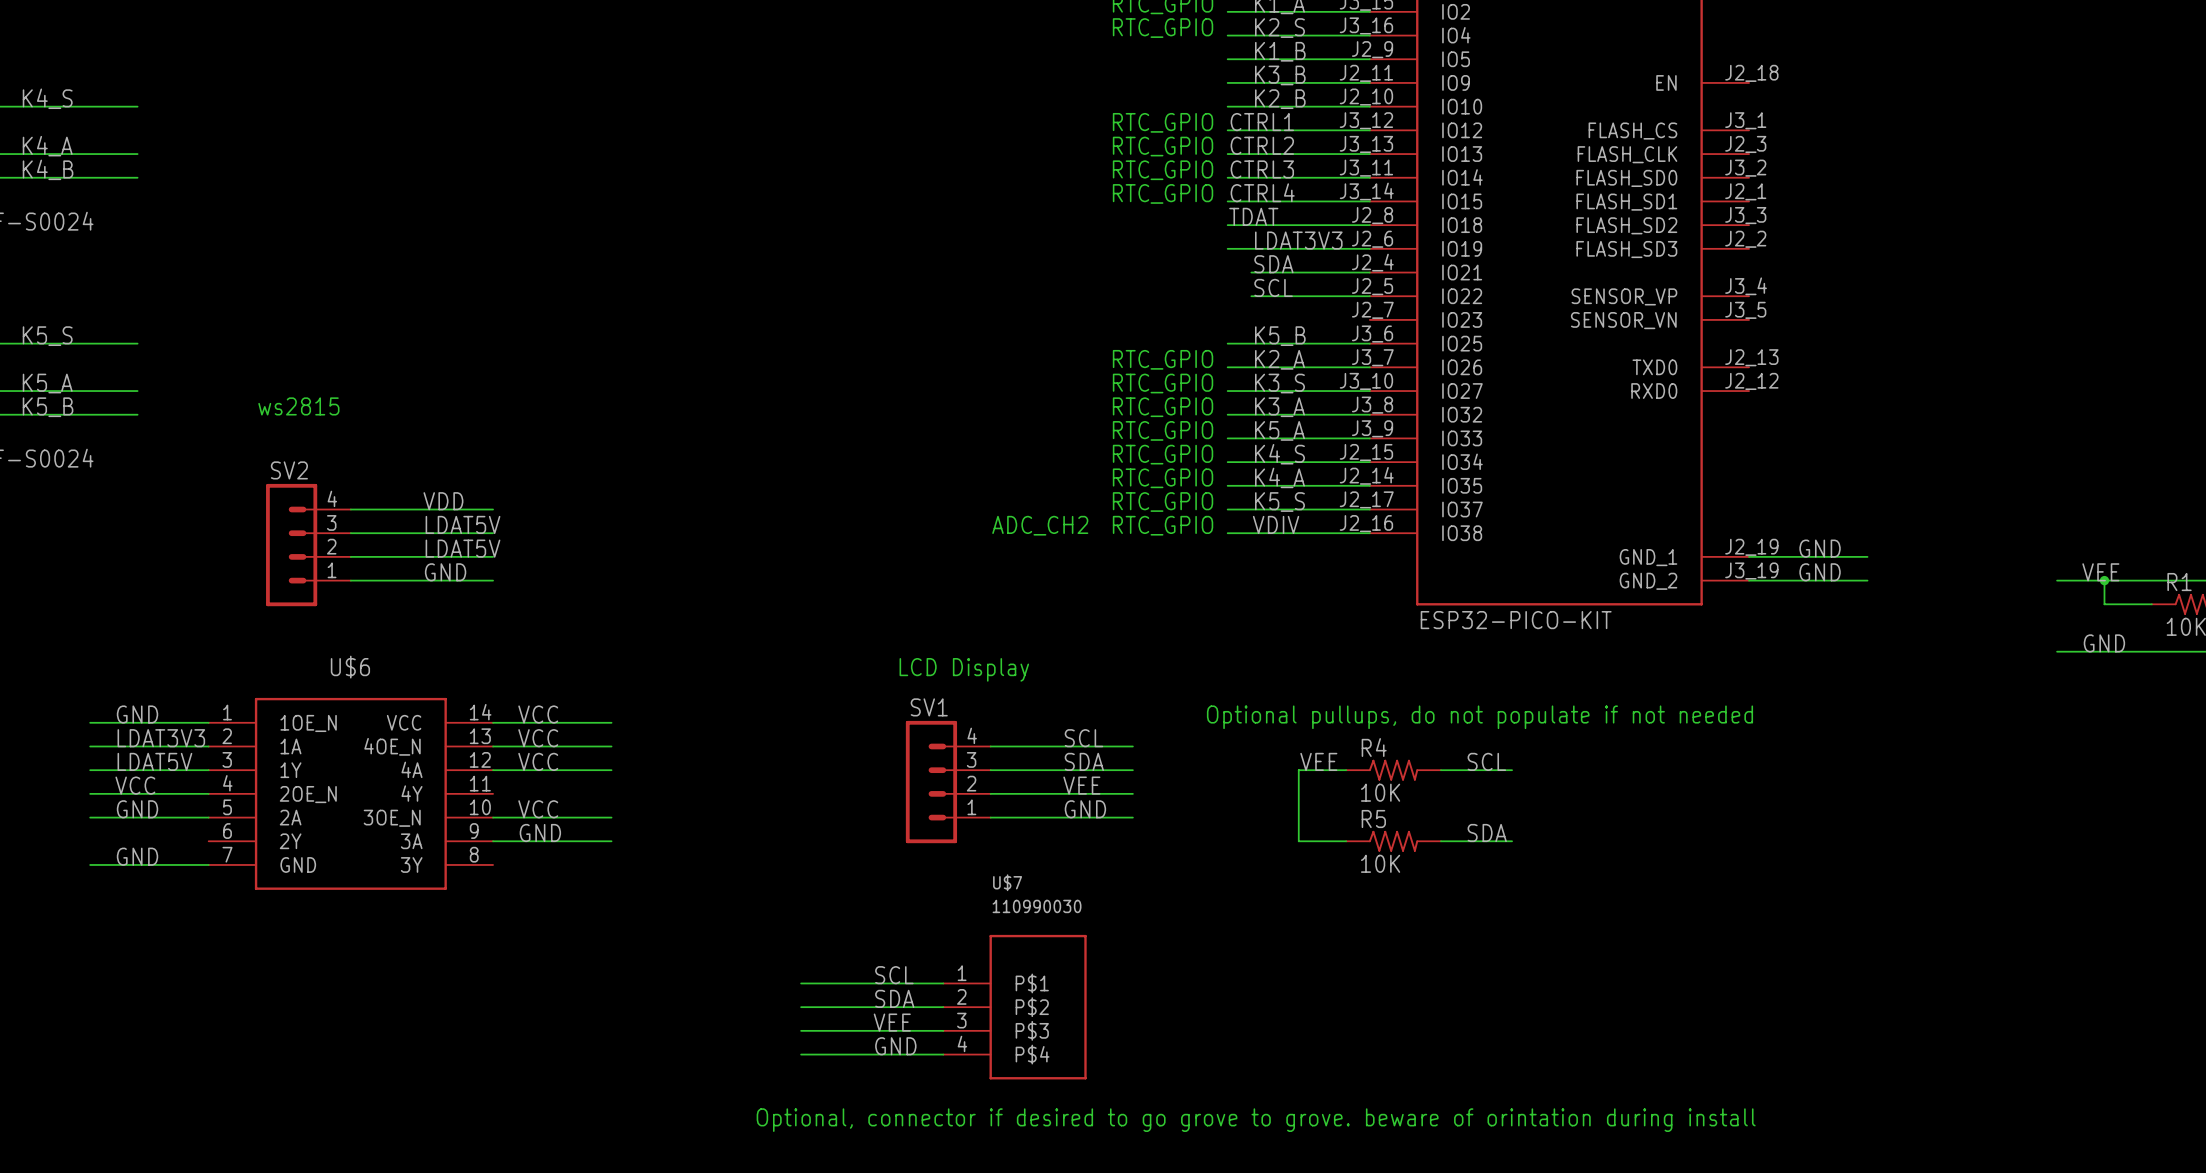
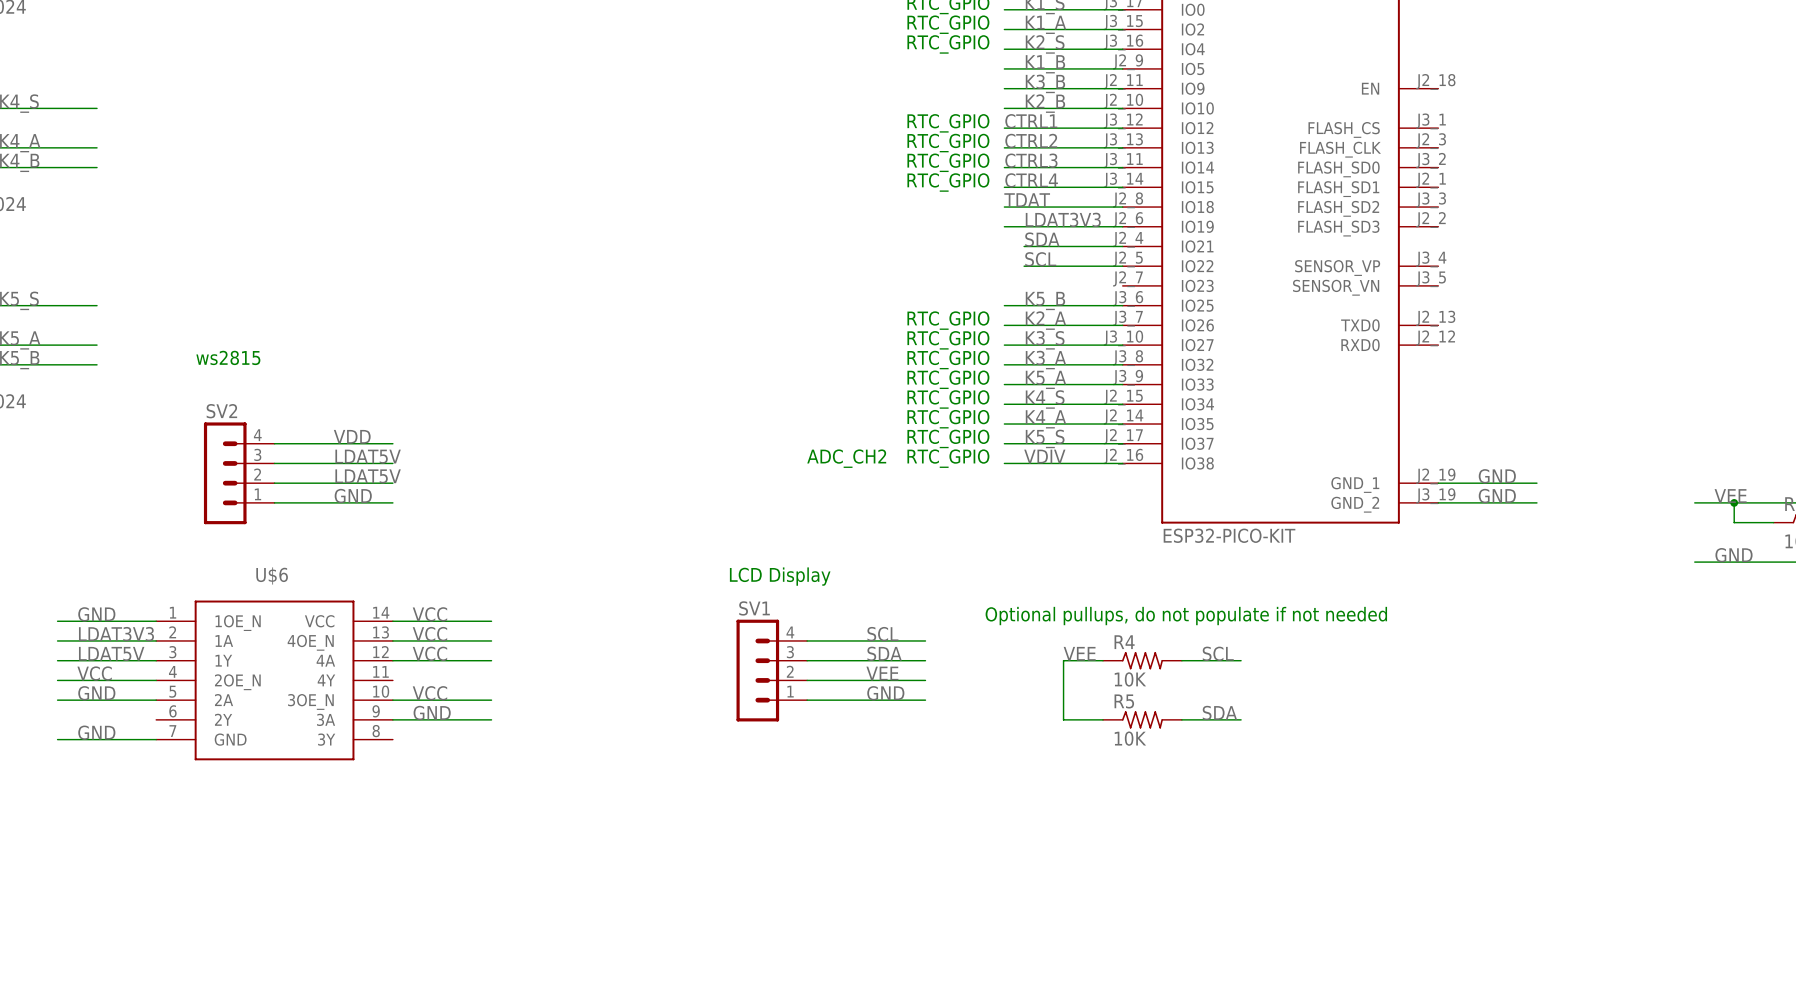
label: SCL (894, 975) -> none
wire: (801, 983) (943, 983) -> none
label: SDA (894, 998) -> none
wire: (801, 1007) (943, 1007) -> none
U$7: 110990030 (1014, 1007) -> none
label: VEE (892, 1022) -> none
wire: (801, 1030) (943, 1030) -> none
label: GND (895, 1046) -> none
wire: (801, 1054) (943, 1054) -> none
text: Optional, connector if desired to go grove to grove. beware of orintation during install (1256, 1120) -> none

